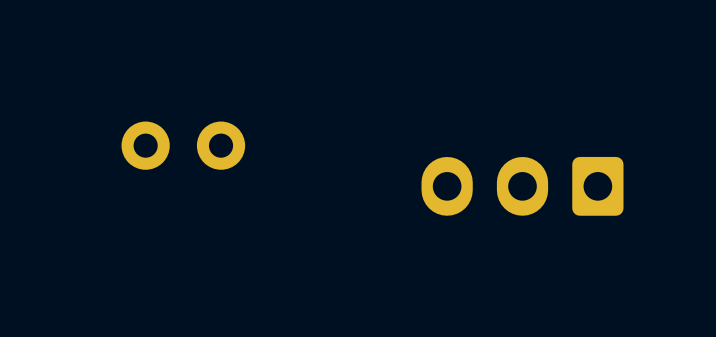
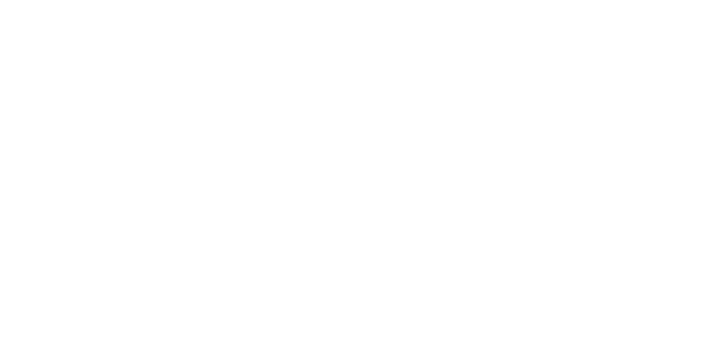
part: (183, 145) -> none
part: (522, 186) -> none

